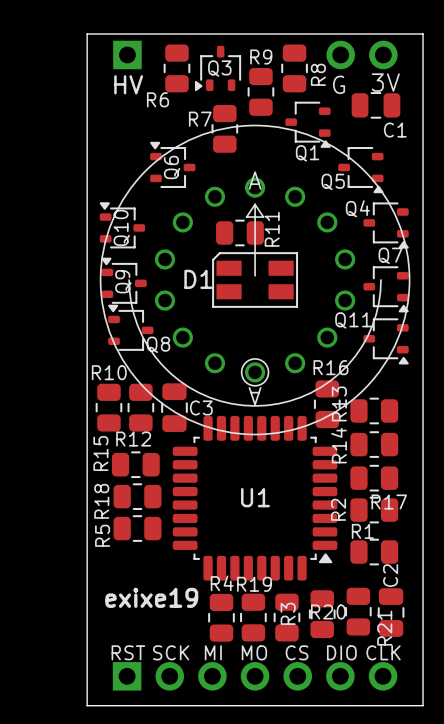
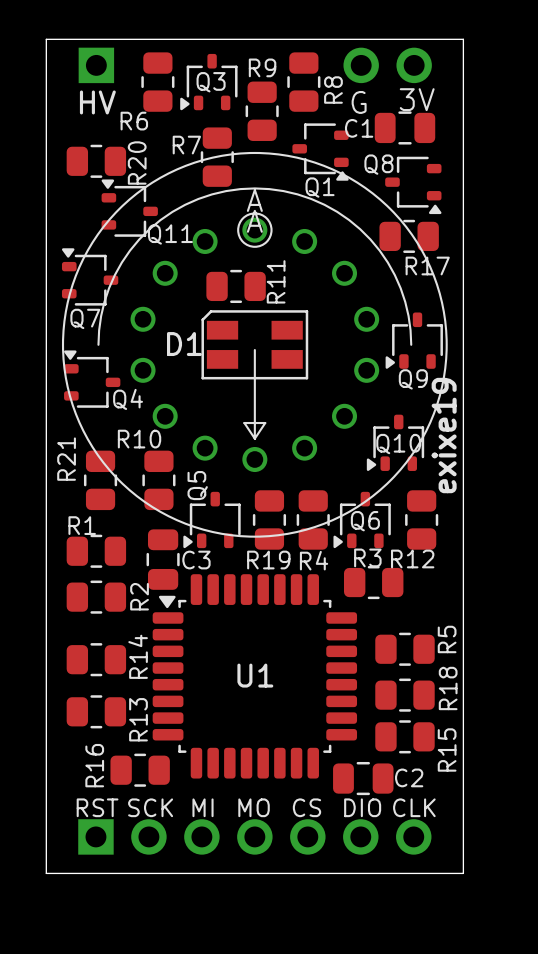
C1 name position: C1 (395, 130) -> C1 (359, 128)
Q6 rotation: 0° (172, 164) -> 90° counterclockwise (362, 519)
Q6 position: (172, 164) -> (362, 519)
Q5 rotation: 0° (360, 170) -> 90° clockwise (212, 519)
Q5 position: (360, 170) -> (212, 519)
Q4 rotation: 0° (386, 225) -> 180° (92, 379)
Q4 position: (386, 225) -> (92, 379)
Q10 name: Q10 (121, 227) -> Q7 (85, 318)
Q9 rotation: 0° (124, 280) -> 90° counterclockwise (414, 340)
Q9 position: (124, 280) -> (414, 340)
part rotation: 0° (255, 280) -> 180° (254, 344)
Q7: (386, 289) -> none
Q8 rotation: 0° (130, 327) -> 180° (413, 185)
Q8 position: (130, 327) -> (413, 185)
Q11 rotation: 0° (386, 341) -> 180° (129, 208)
Q11 position: (386, 341) -> (129, 208)
Q10: none -> (395, 442)
R16 name position: R16 (330, 367) -> R16 (94, 765)
R10 name position: R10 (109, 372) -> R10 (139, 439)
R13 name position: R13 (339, 403) -> R13 (138, 719)
R16 rotation: 0° (327, 404) -> 90° clockwise (140, 770)
R16 position: (327, 404) -> (140, 770)
R10 position: (108, 407) -> (158, 480)
R12 position: (140, 407) -> (421, 519)
C3 position: (174, 407) -> (163, 559)
R13 position: (374, 410) -> (96, 711)
R14 position: (374, 444) -> (96, 659)
R14 name position: R14 (339, 445) -> R14 (138, 656)
R15 name position: R15 (100, 453) -> R15 (447, 750)
R15 position: (135, 464) -> (404, 736)
R17 position: (374, 478) -> (409, 236)
R18 position: (137, 496) -> (404, 695)
U1 rotation: 0° (255, 498) -> 180° (254, 676)
R18 name position: R18 (101, 501) -> R18 (448, 688)
R2 name position: R2 (338, 509) -> R2 (139, 596)
R2 position: (374, 510) -> (96, 597)
R5 position: (137, 528) -> (404, 649)
R5 name position: R5 (102, 535) -> R5 (447, 639)
R1 position: (374, 552) -> (96, 551)
R4 name position: R4 (222, 583) -> R4 (314, 560)
R19 name position: R19 (254, 584) -> R19 (268, 560)
text rotation: 0° (151, 597) -> 90° counterclockwise (444, 435)
text position: exixe19 (151, 597) -> exixe19 (444, 435)
R21 position: (358, 611) -> (100, 480)
C2 rotation: 0° (391, 612) -> 90° clockwise (363, 778)
C2 position: (391, 612) -> (363, 778)
R20 rotation: 0° (322, 614) -> 90° clockwise (96, 161)
R20 position: (322, 614) -> (96, 161)
R4 position: (221, 617) -> (313, 519)
R19 position: (253, 617) -> (269, 519)
R3 rotation: 0° (286, 617) -> 90° clockwise (373, 582)
R3 position: (286, 617) -> (373, 582)
R21 name position: R21 (384, 628) -> R21 (66, 459)

